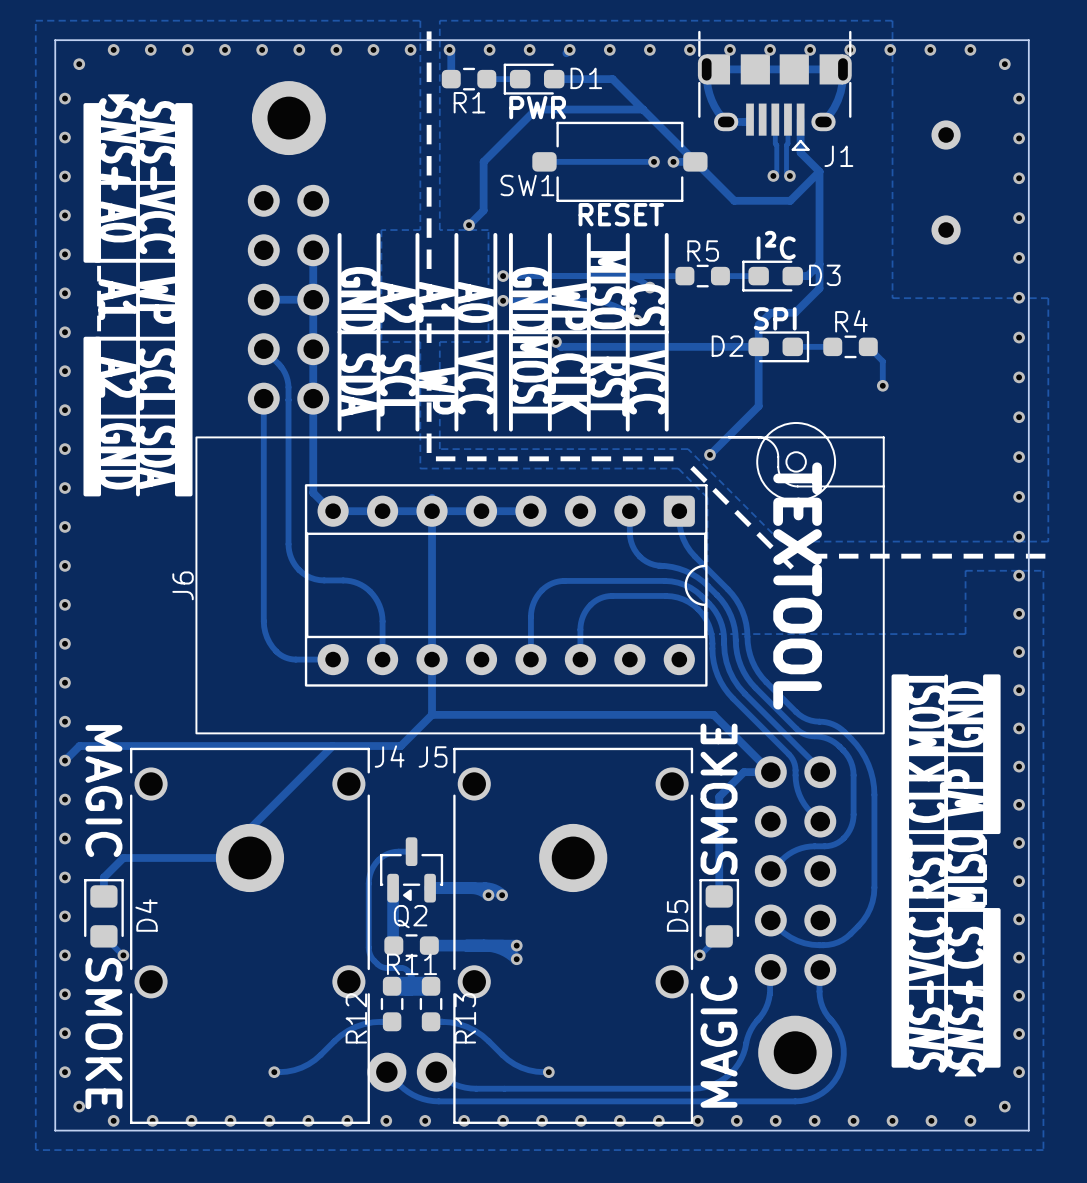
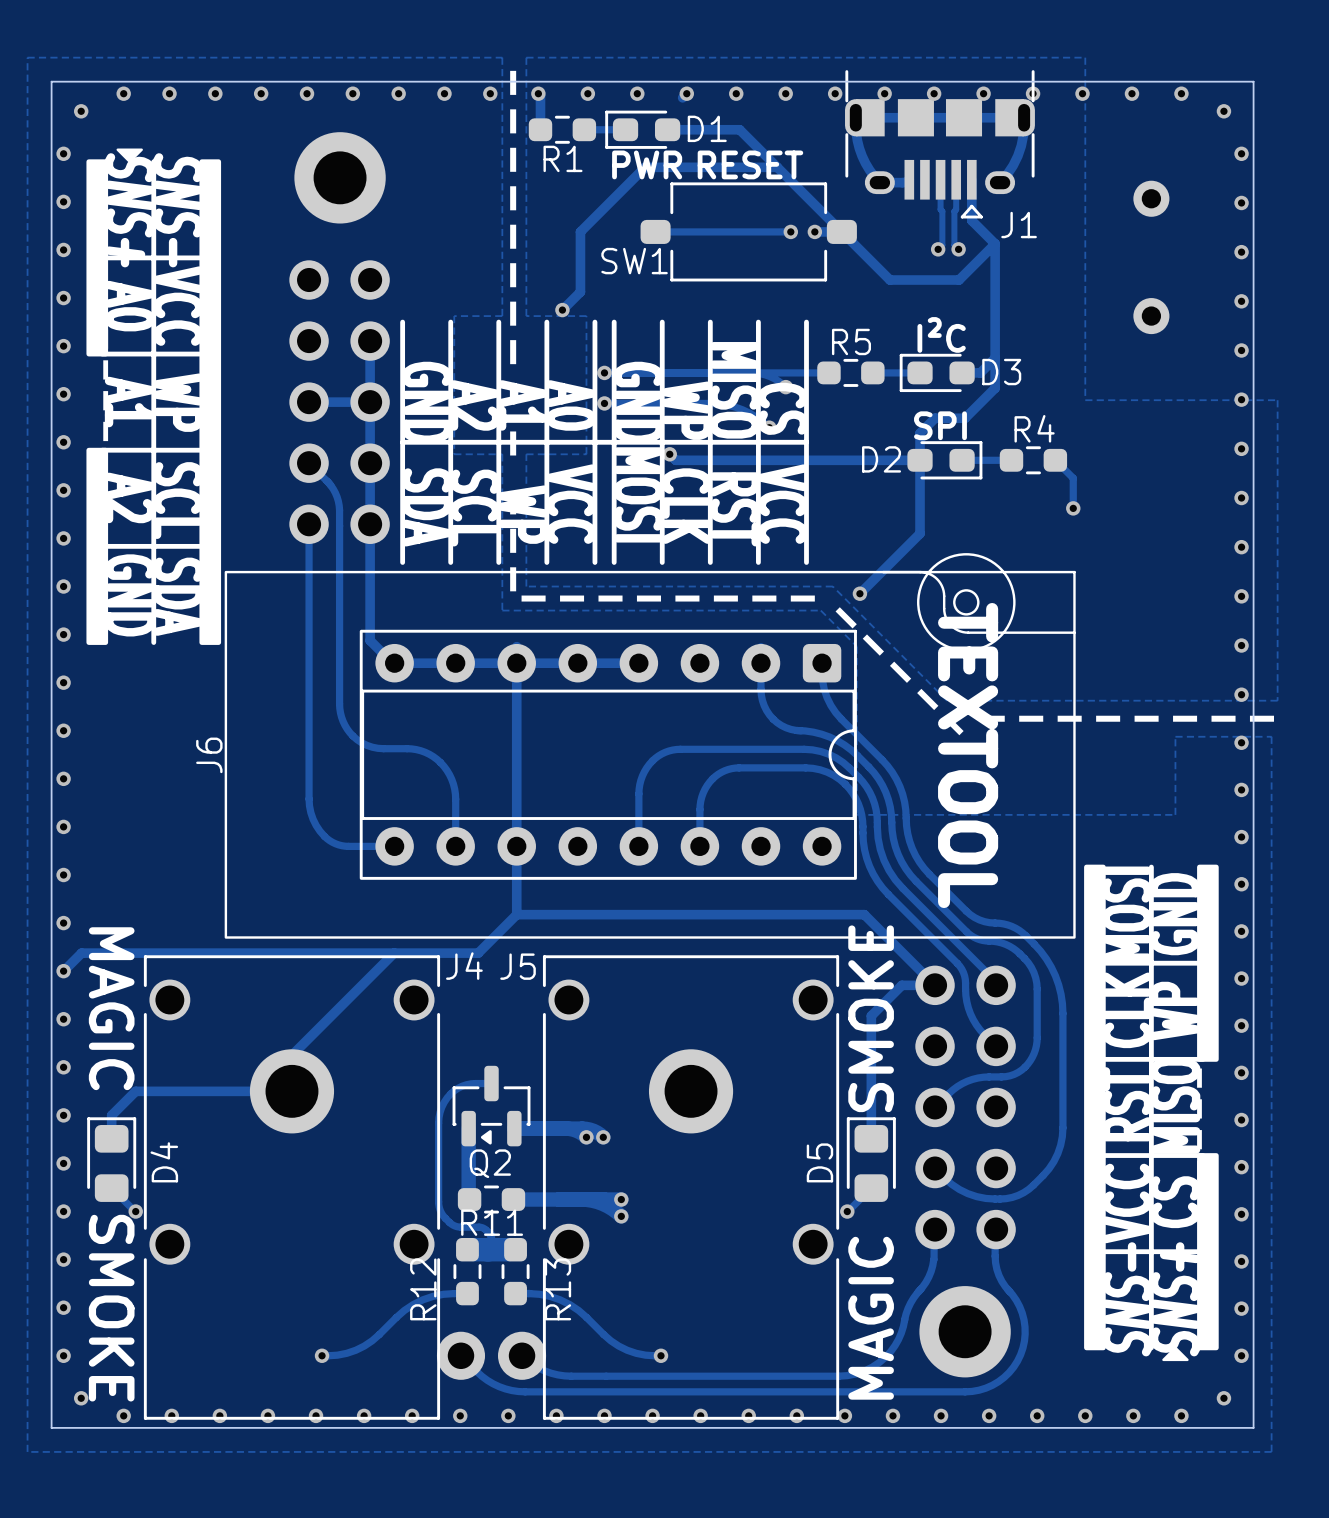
SW1 text position: RESET (621, 214) -> RESET (750, 164)

